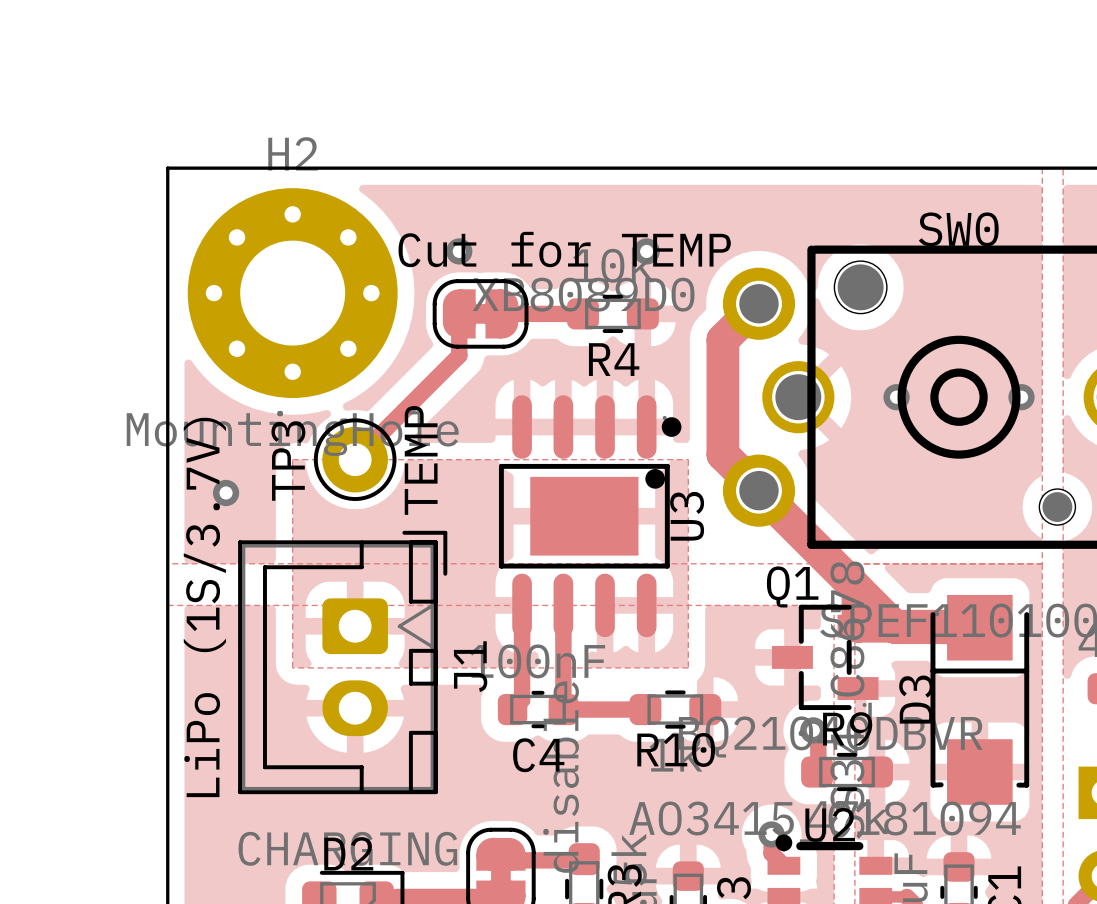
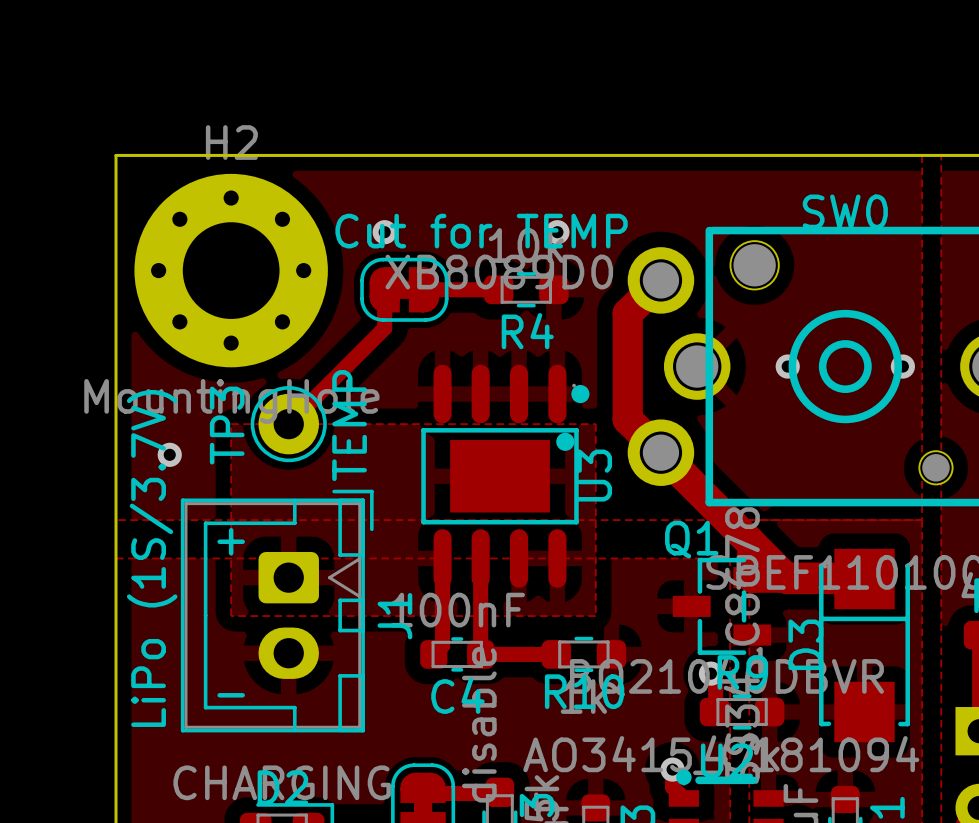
text: none -> + (231, 541)
text: none -> - (231, 695)

